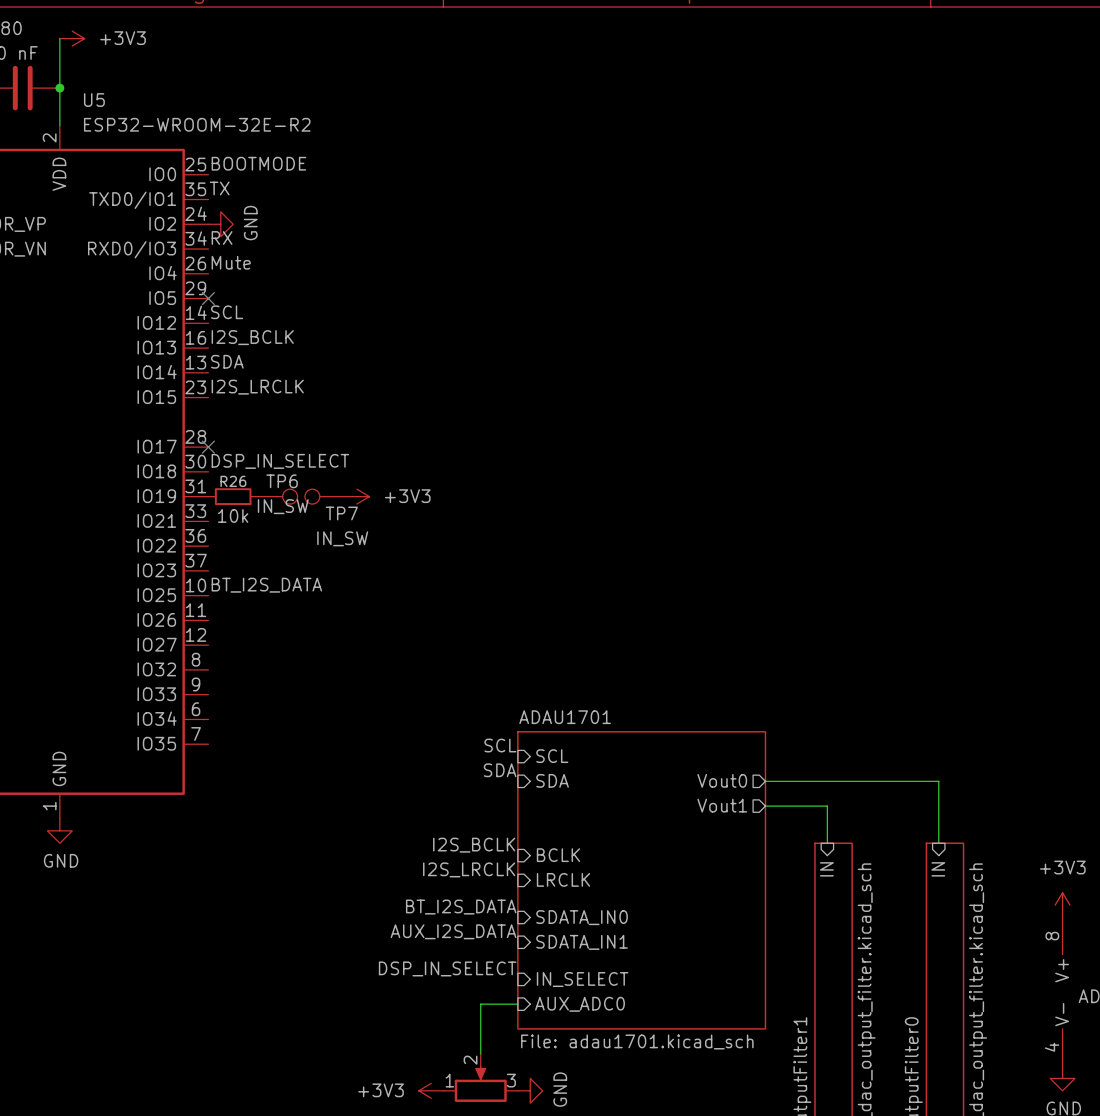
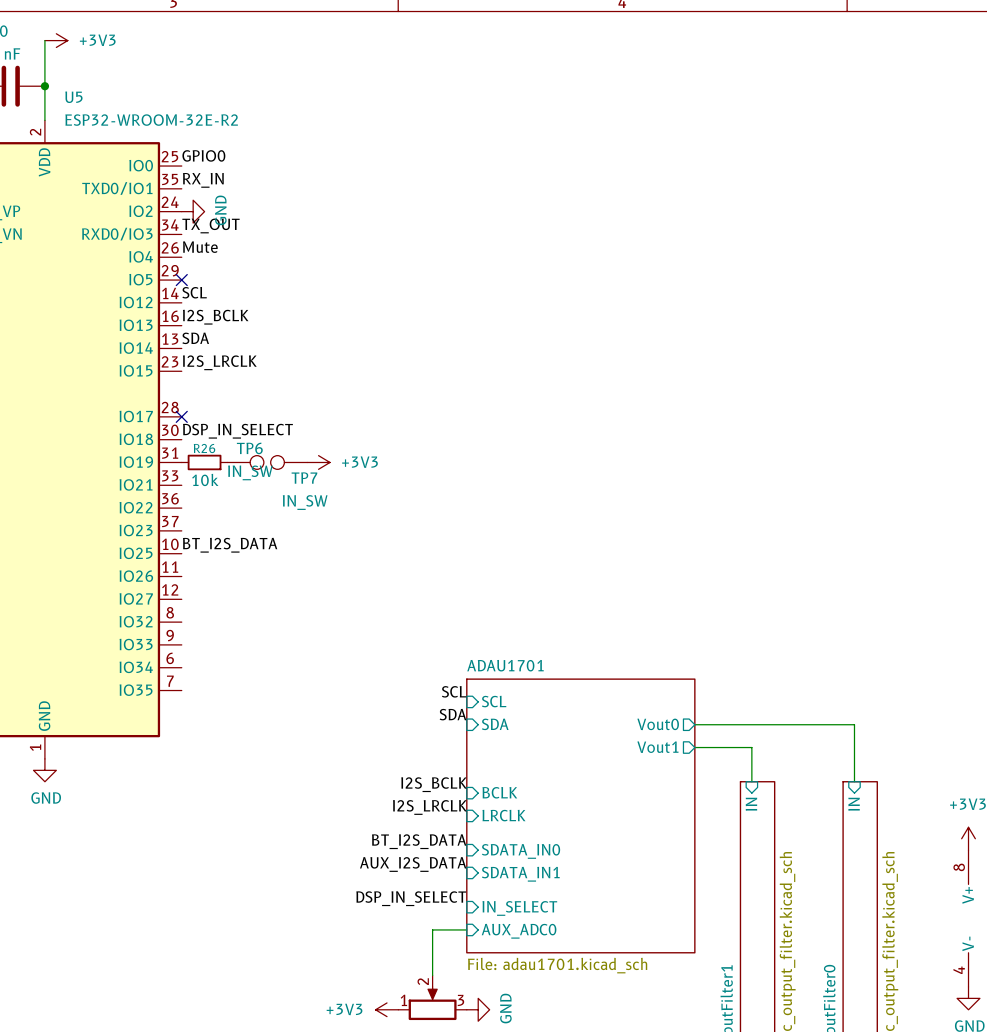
label: BOOTMODE (258, 163) -> GPIO0 (203, 155)
label: TX (219, 188) -> RX_IN (203, 180)
label: RX (222, 237) -> TX_OUT (210, 225)

